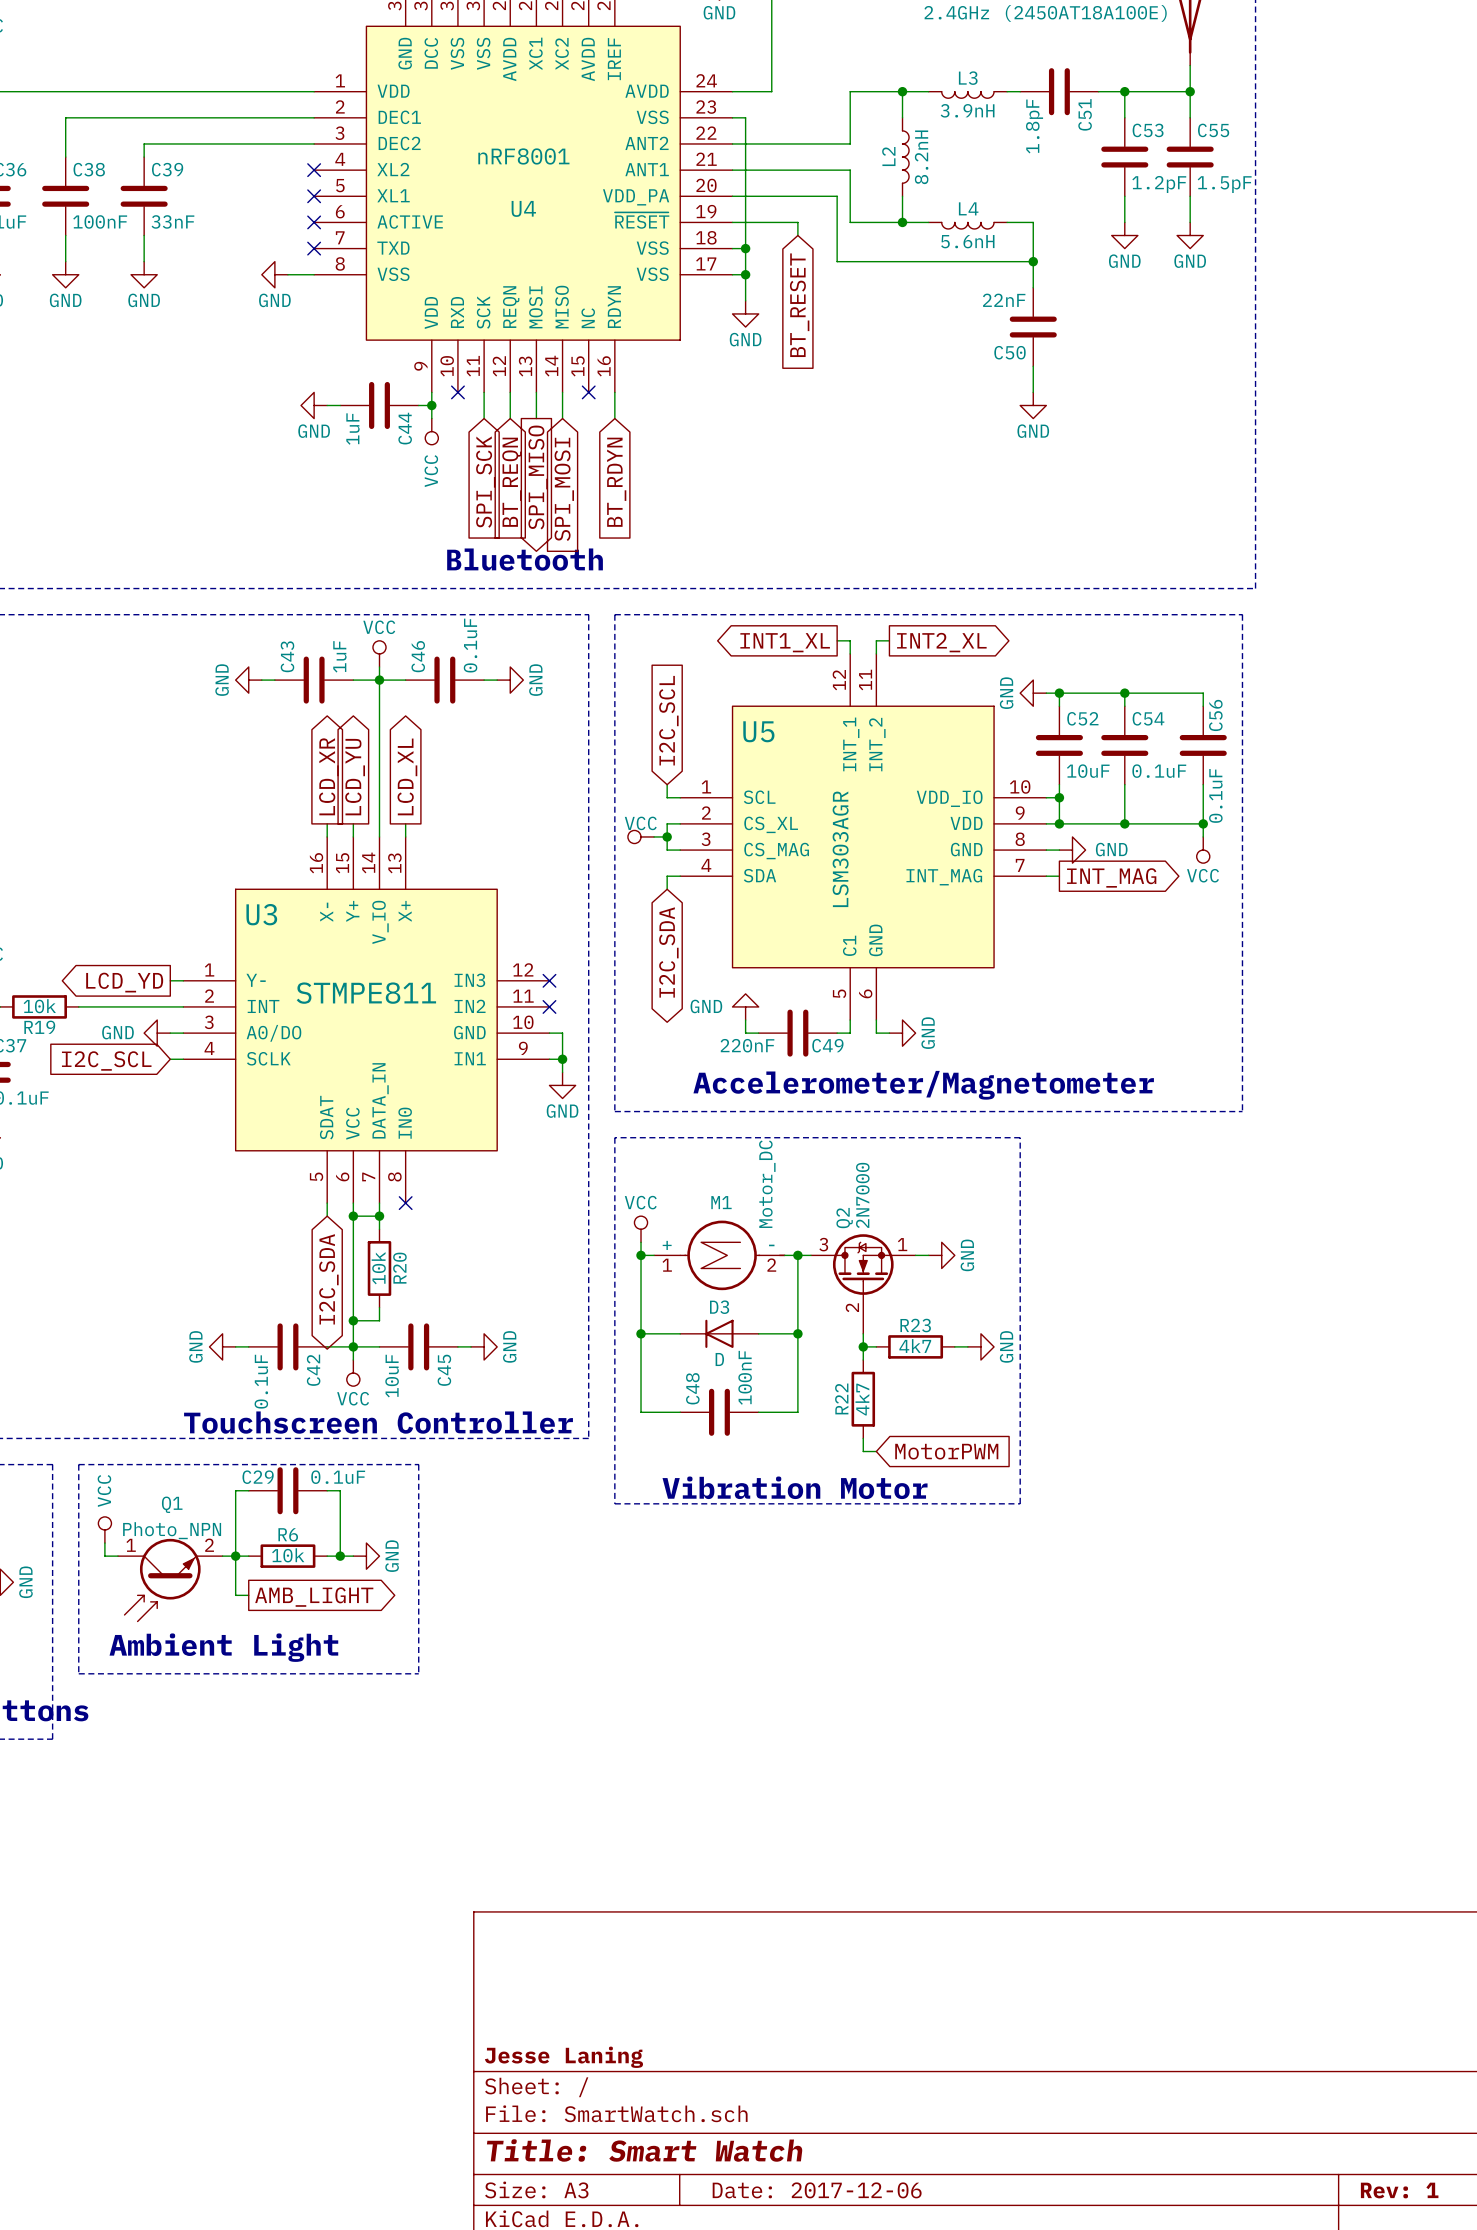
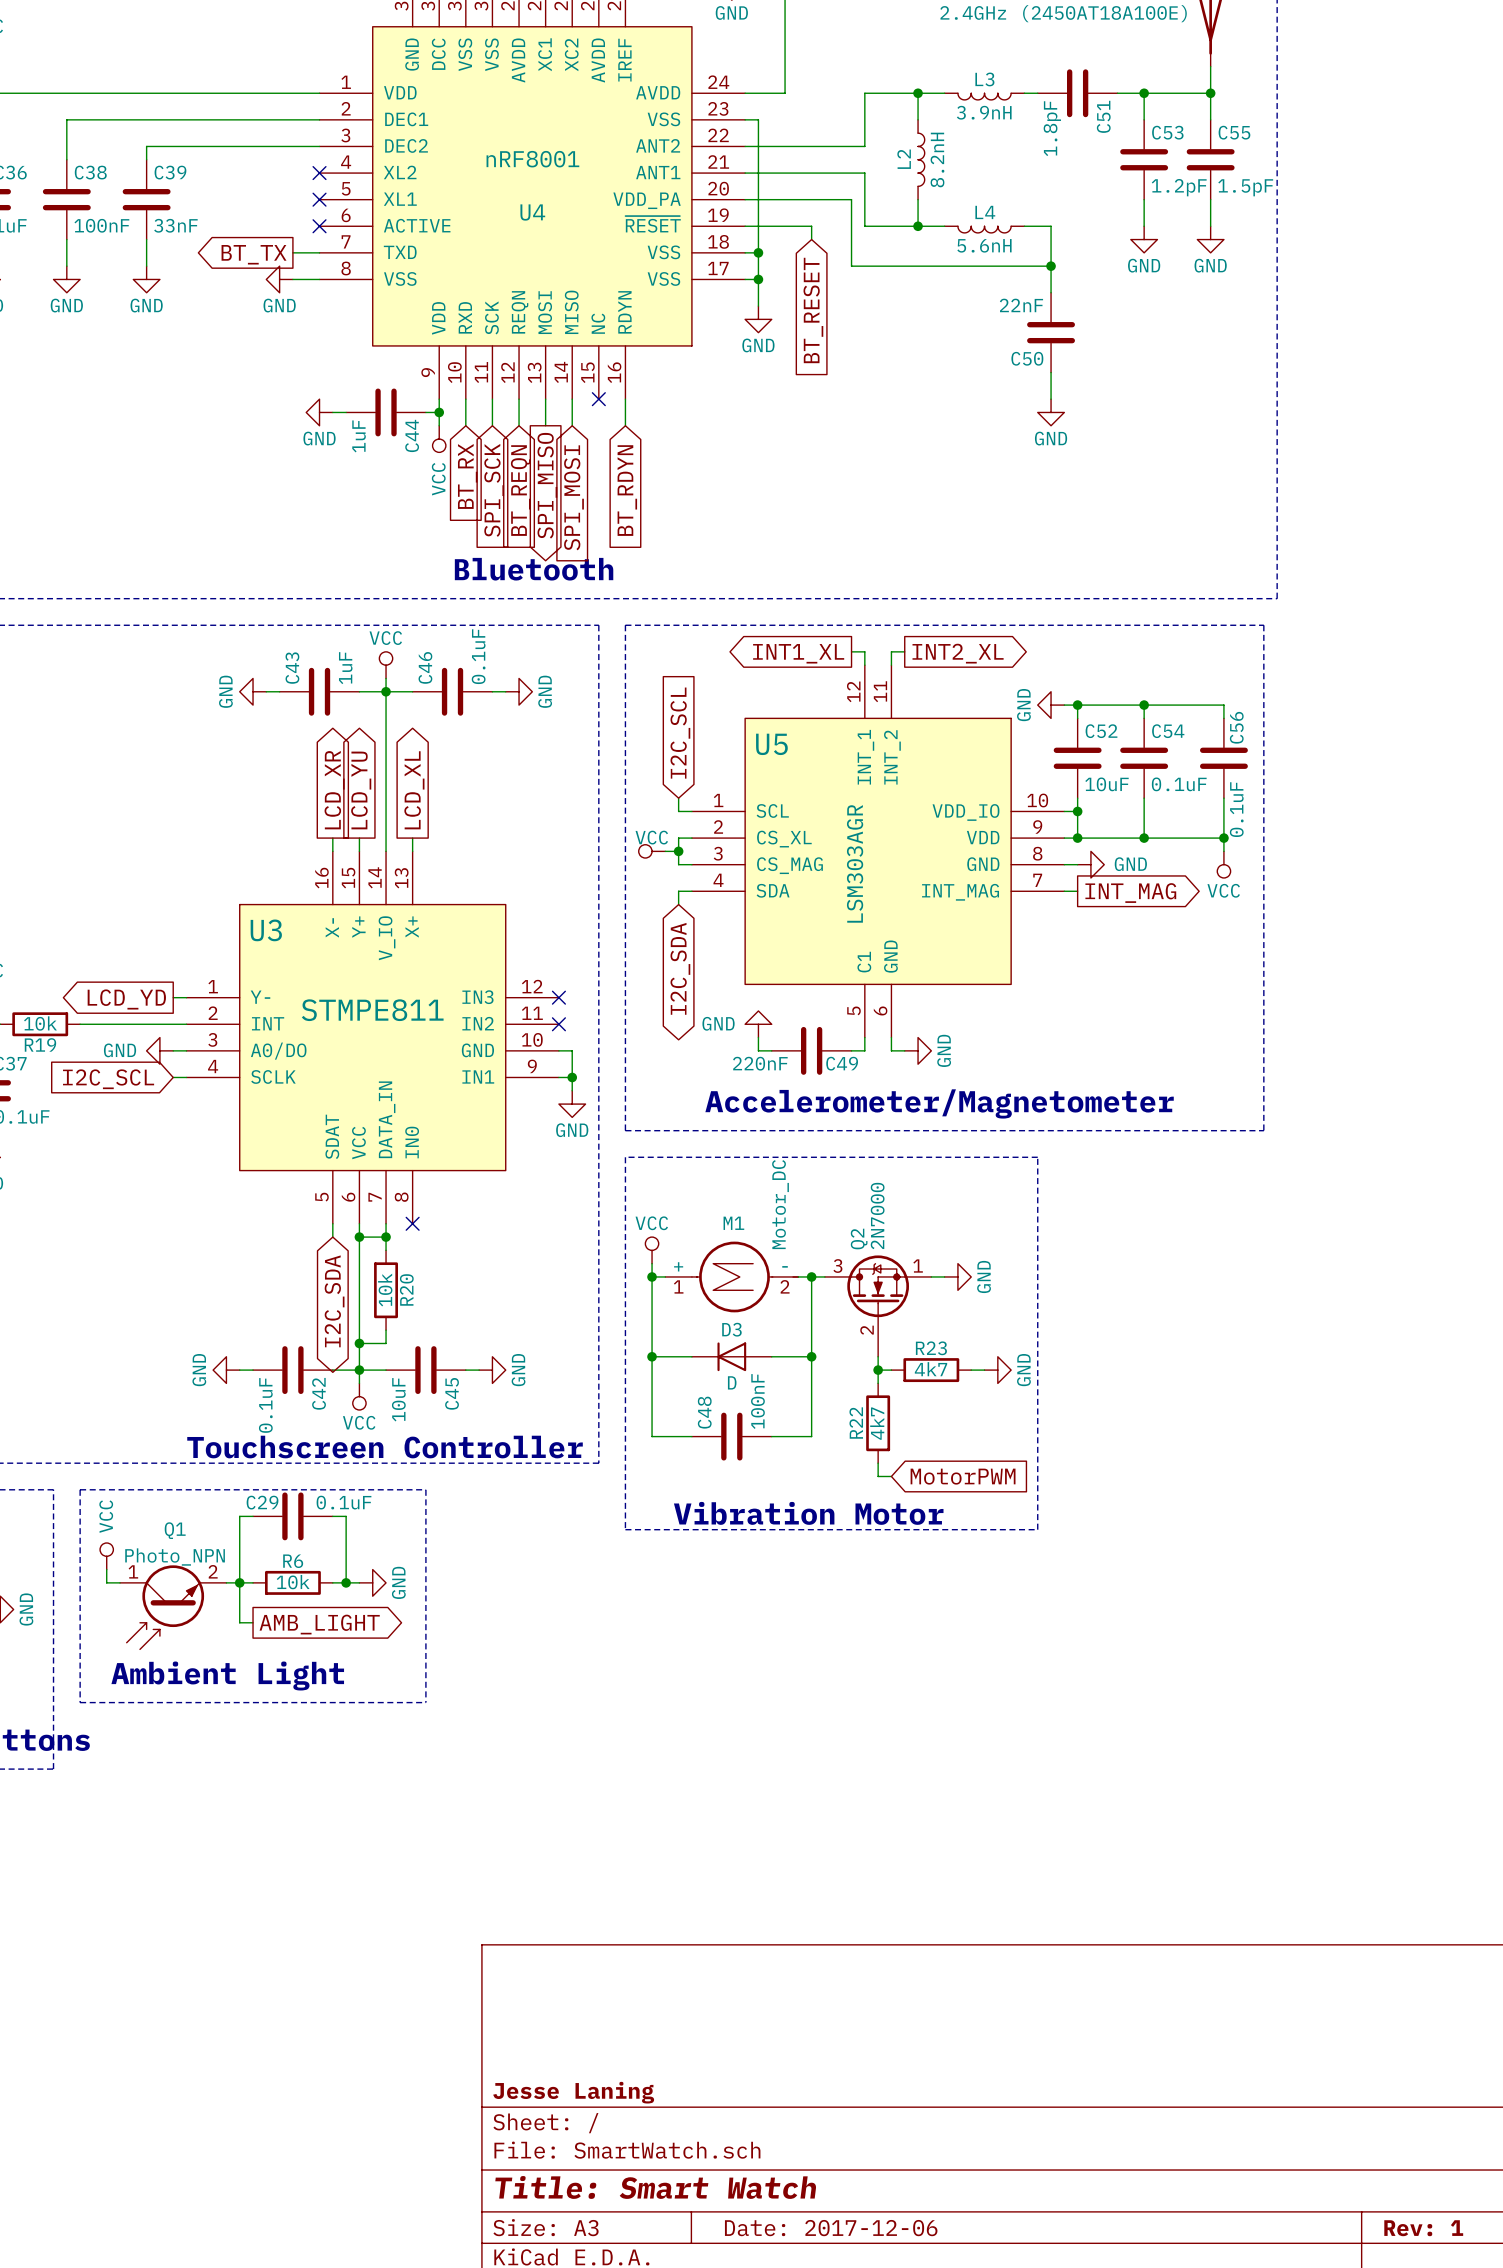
wire: none -> (292, 252) (319, 252)
no-connect mark: (314, 248) -> none
global label: none -> BT_TX (254, 254)
wire: none -> (465, 399) (465, 425)
no-connect mark: (457, 392) -> none
global label: none -> BT_RX (467, 476)

